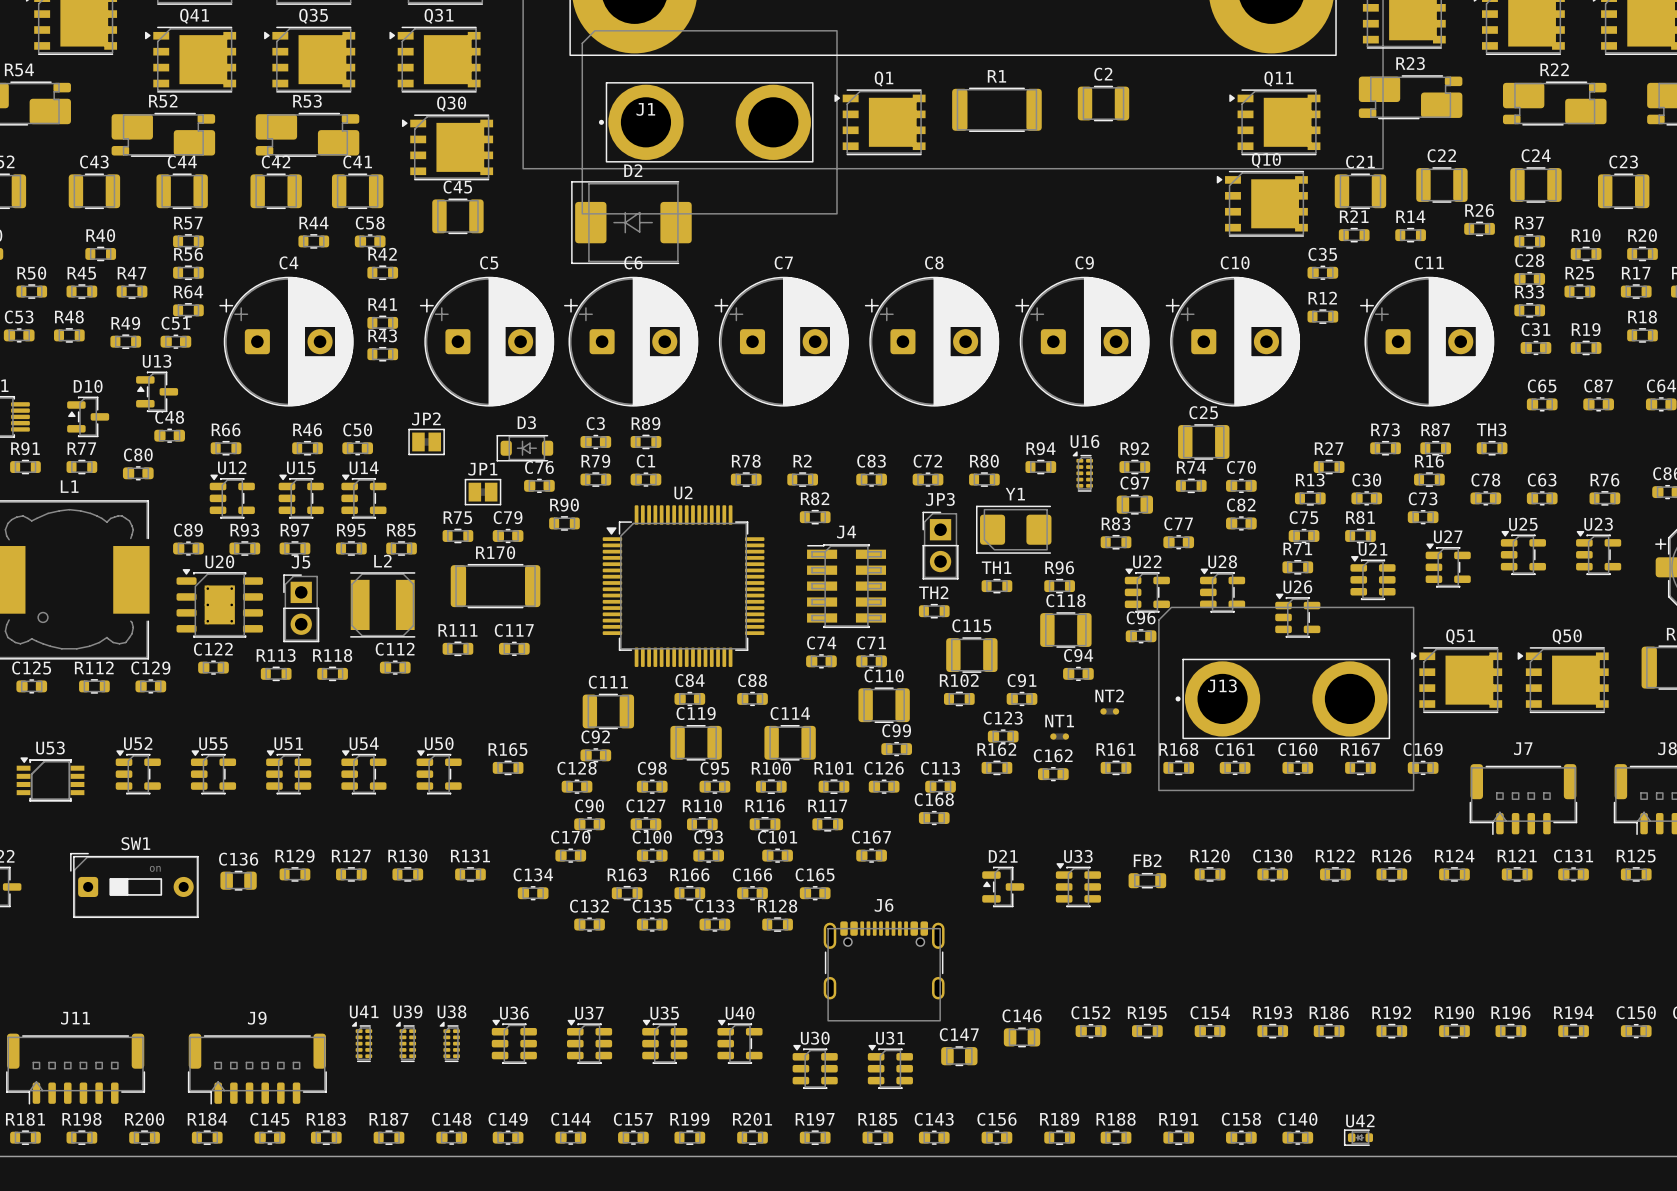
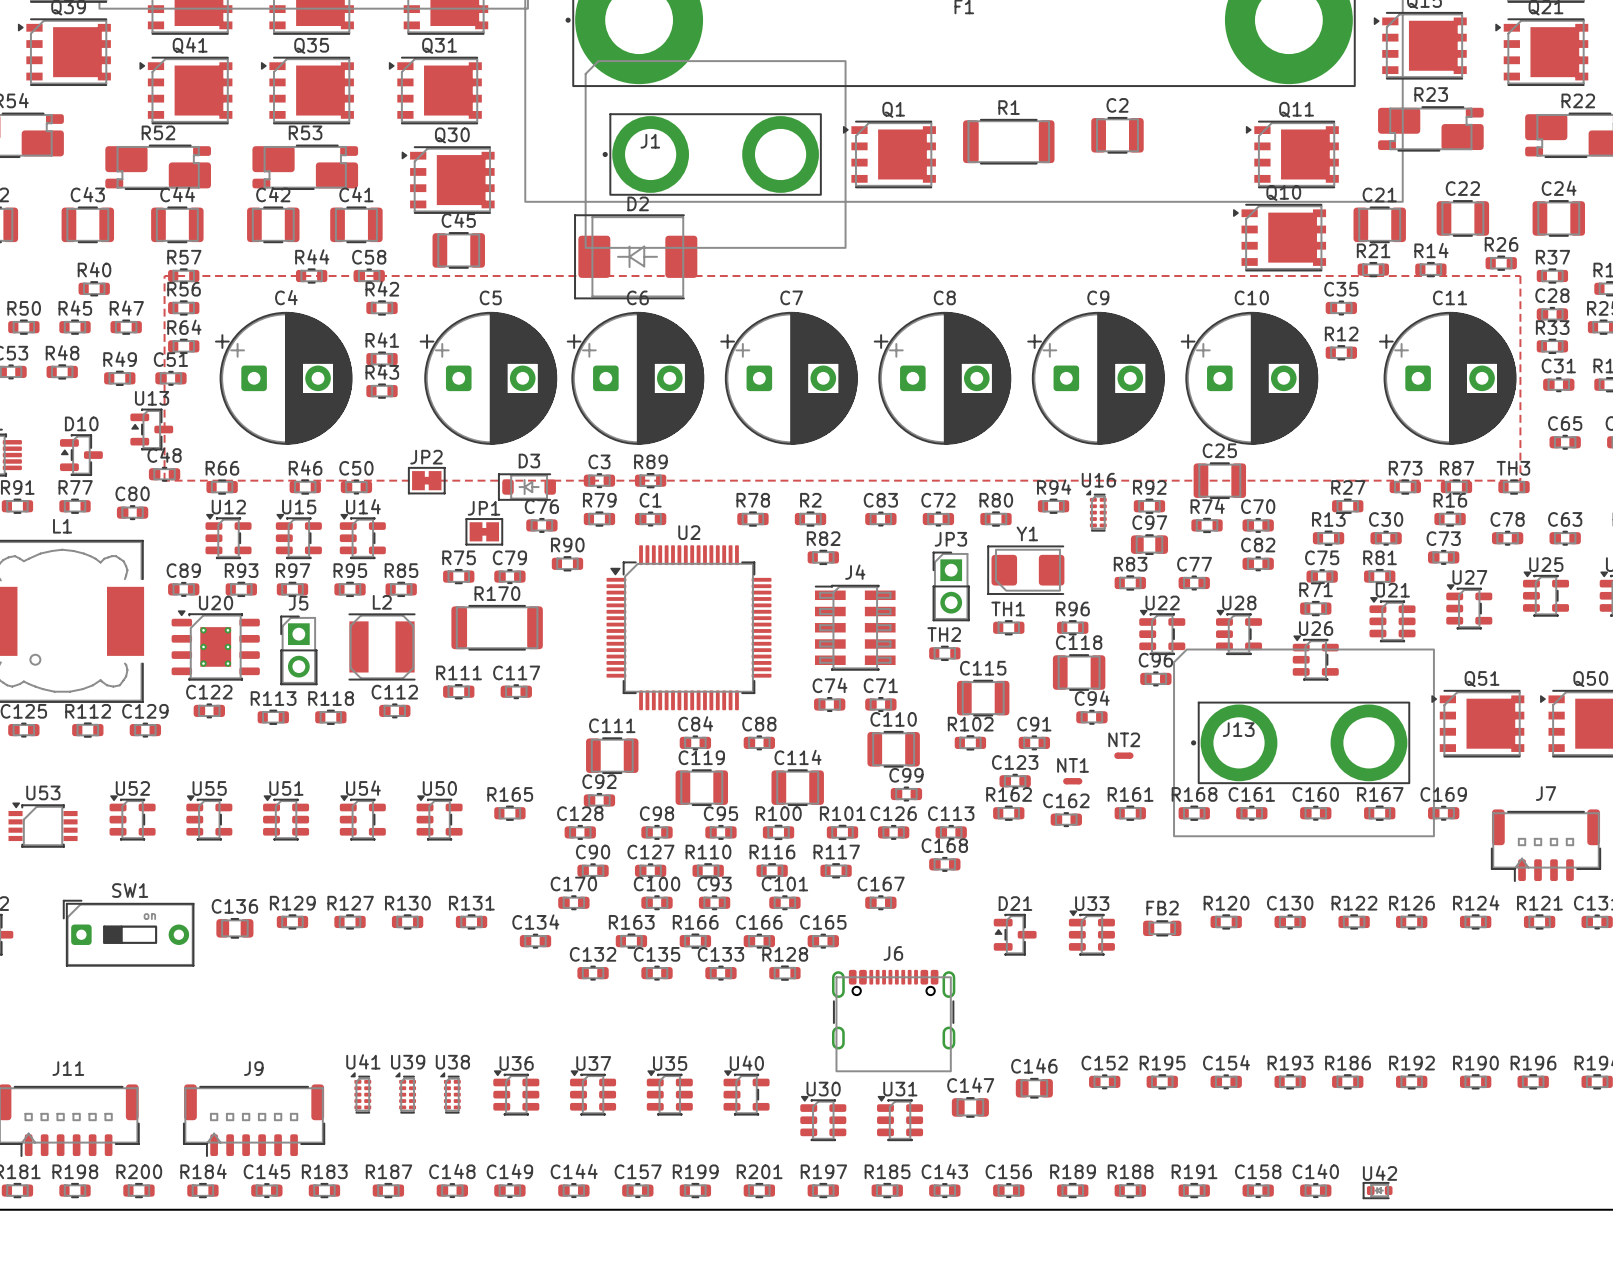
zone outline: none -> (164, 276) (1520, 276) (1520, 480) (164, 480) (164, 276)

